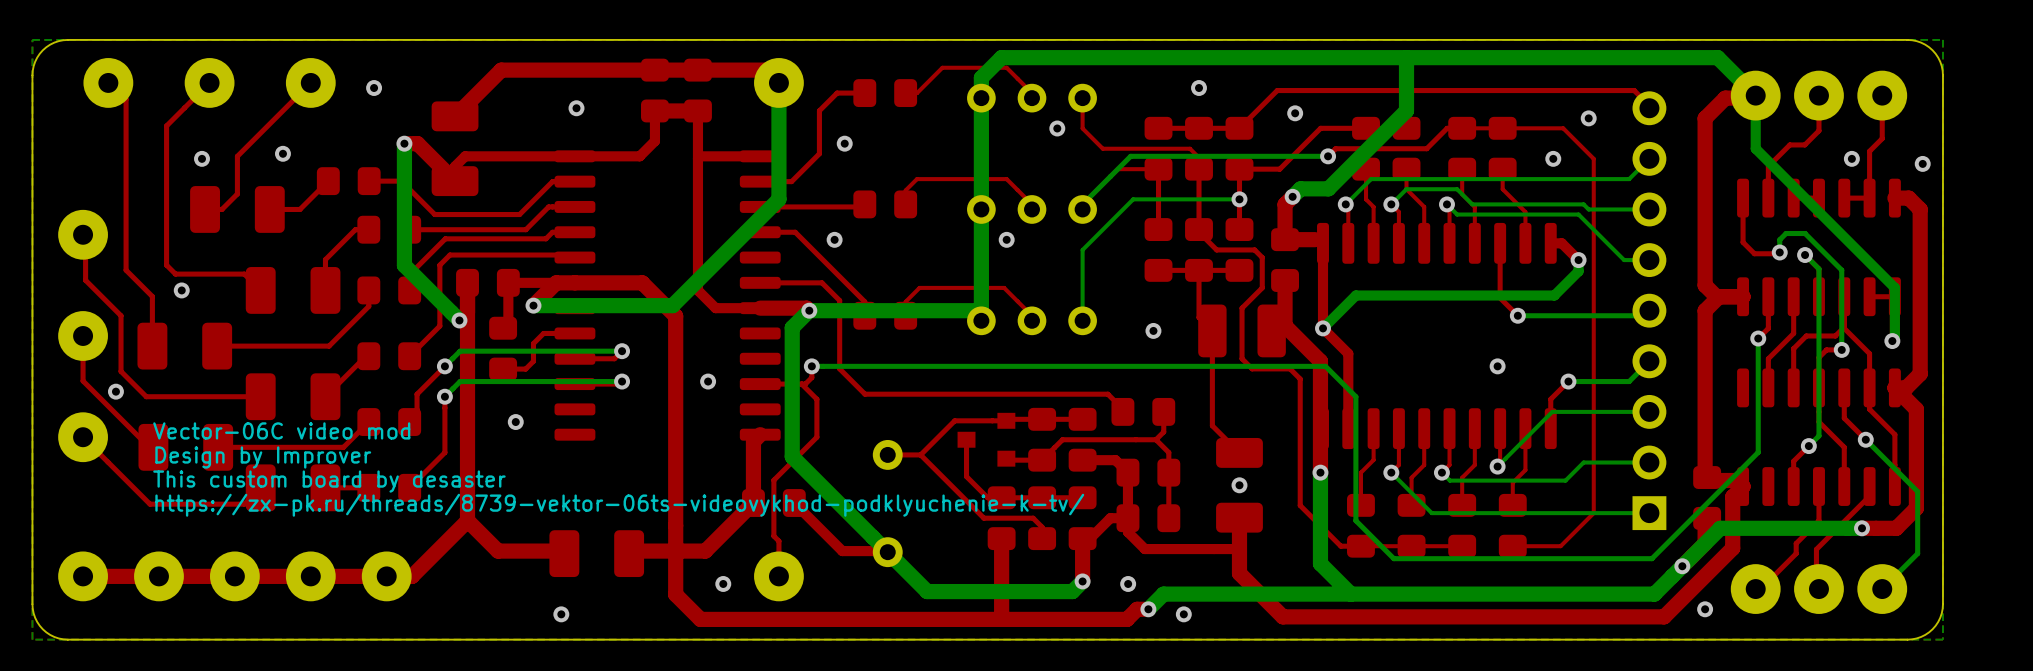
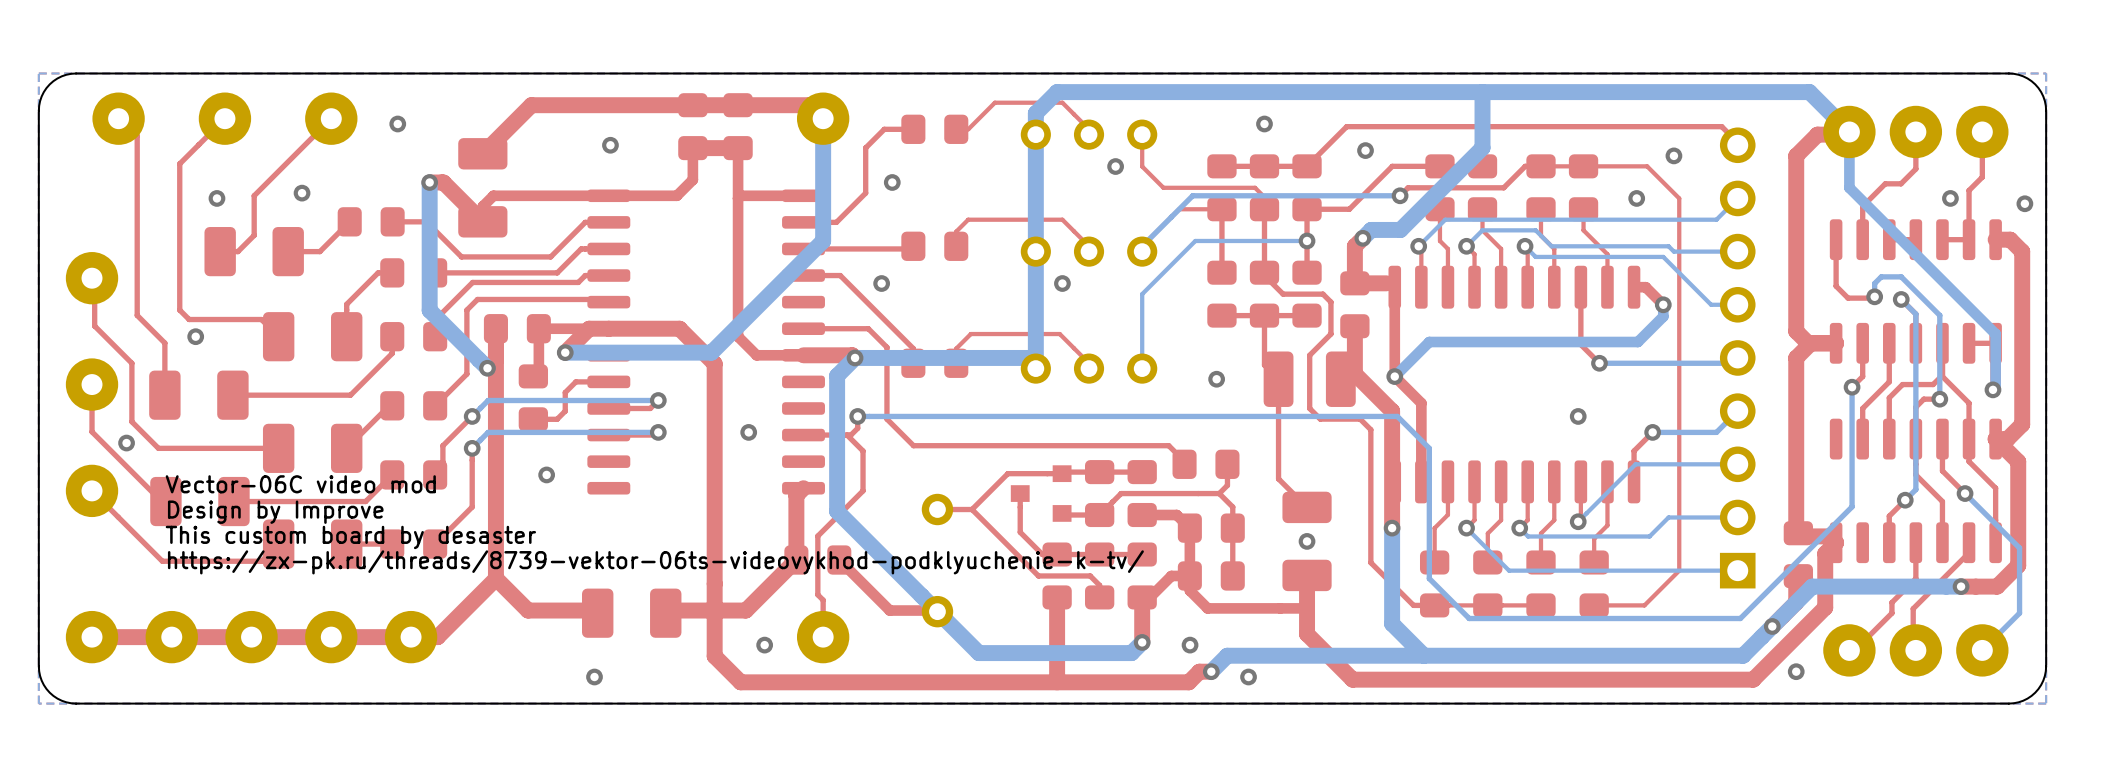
text: Design by Improver (263, 457) -> Design by Improve (275, 512)

